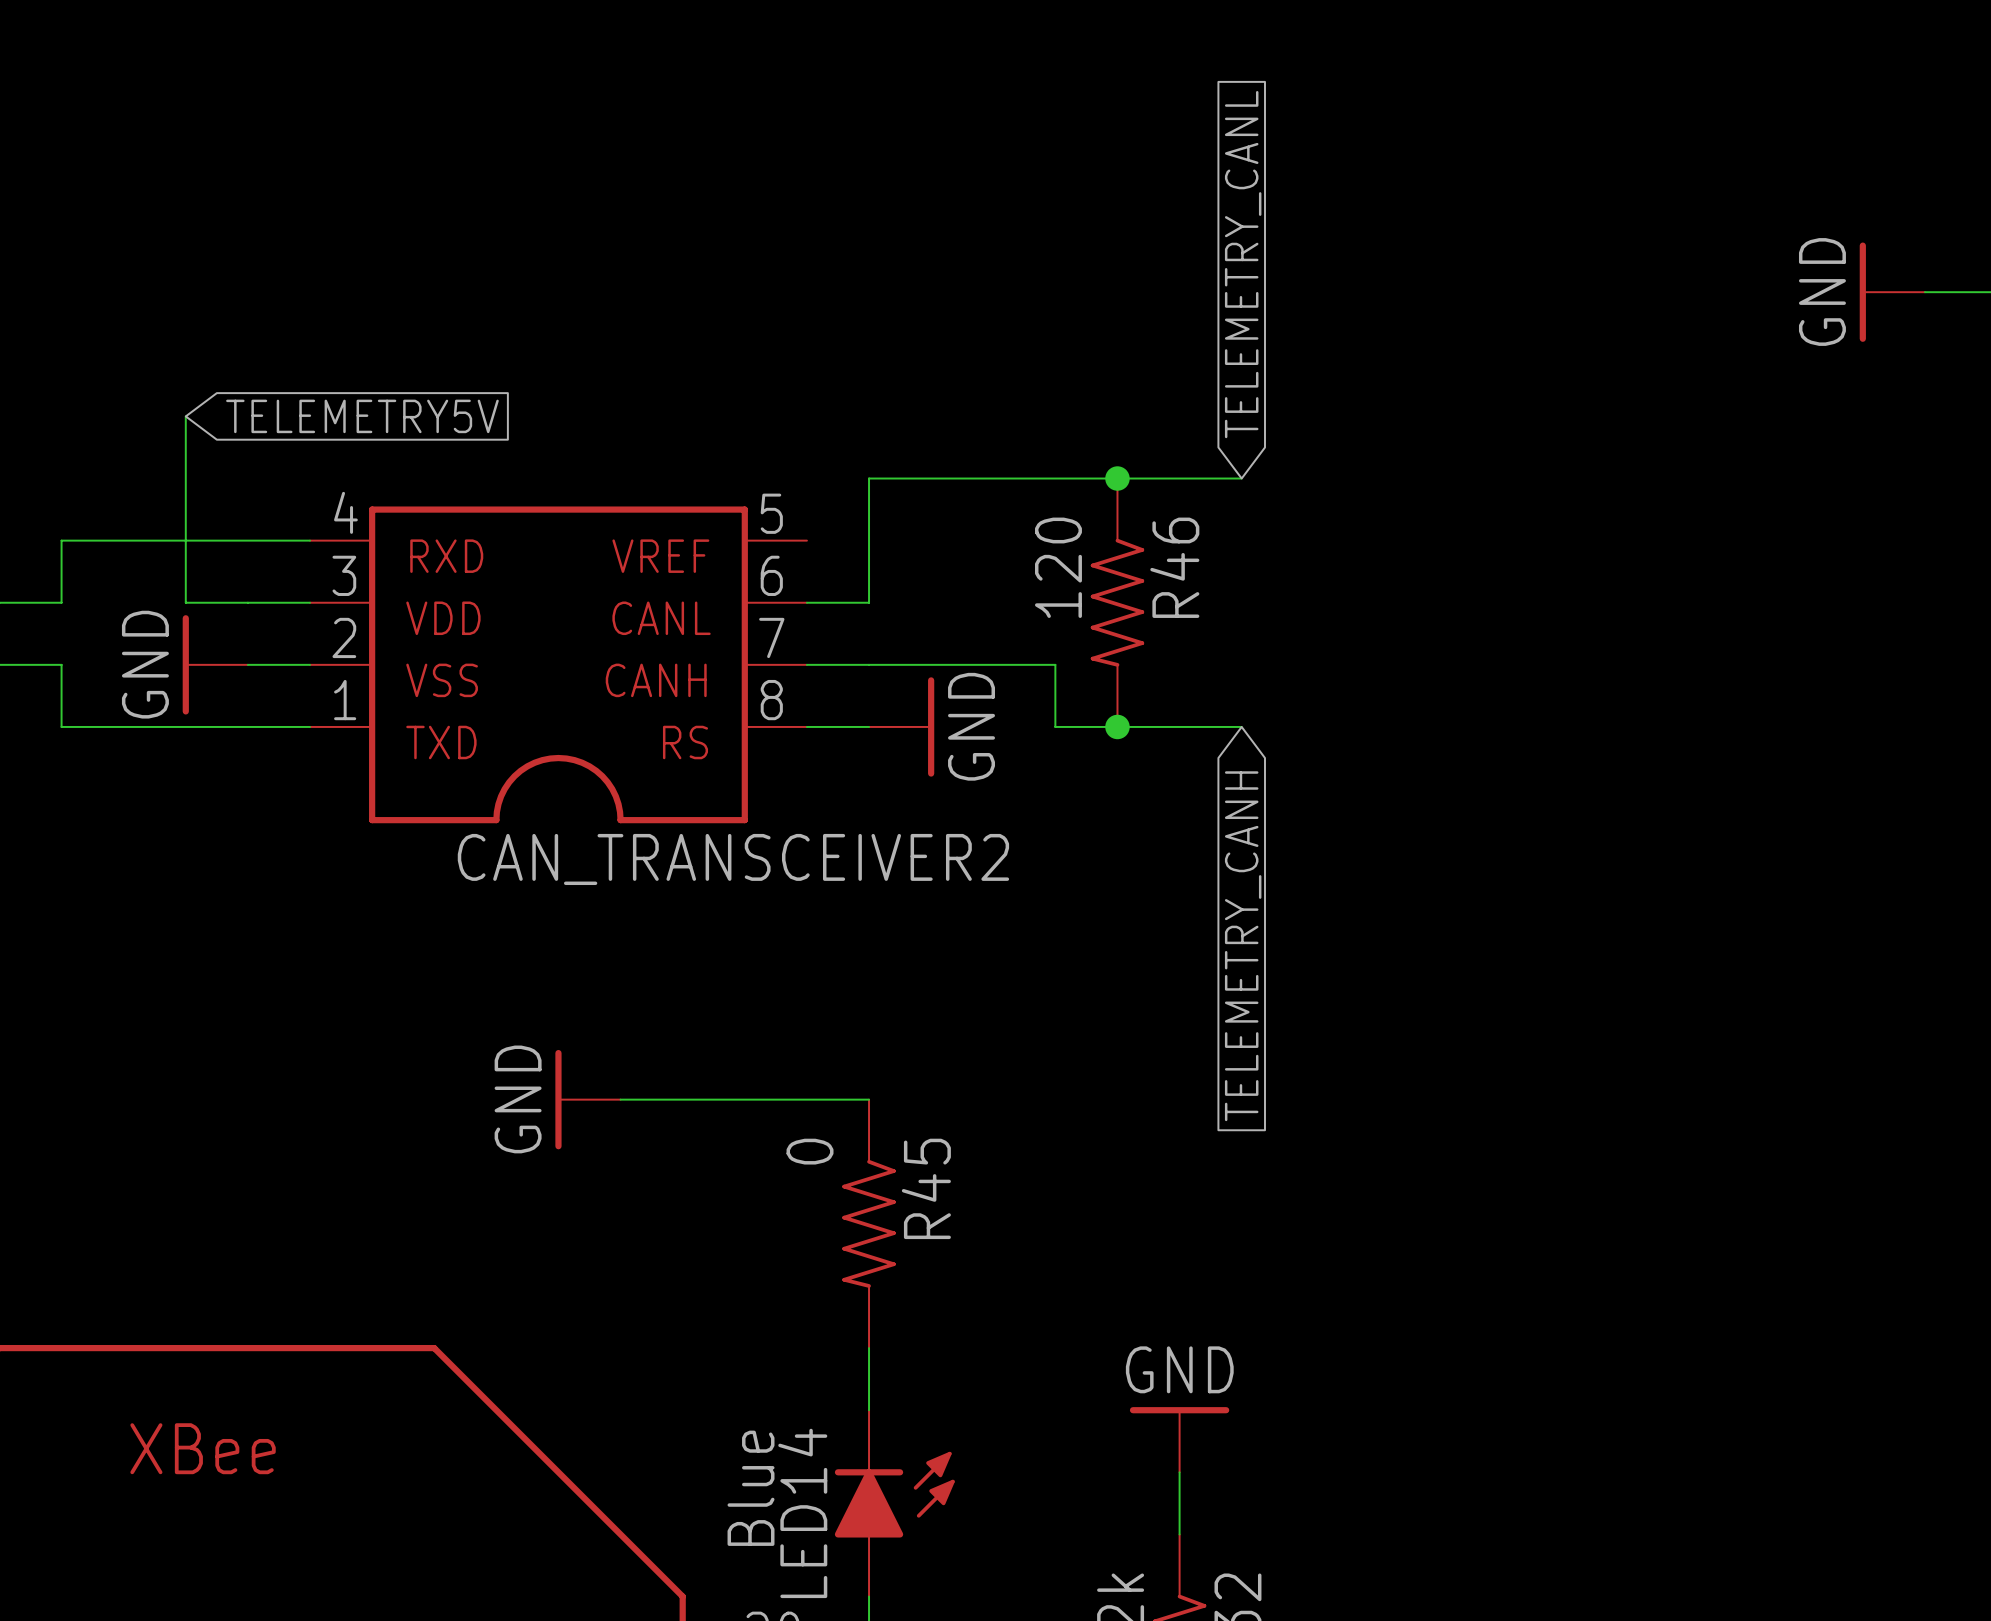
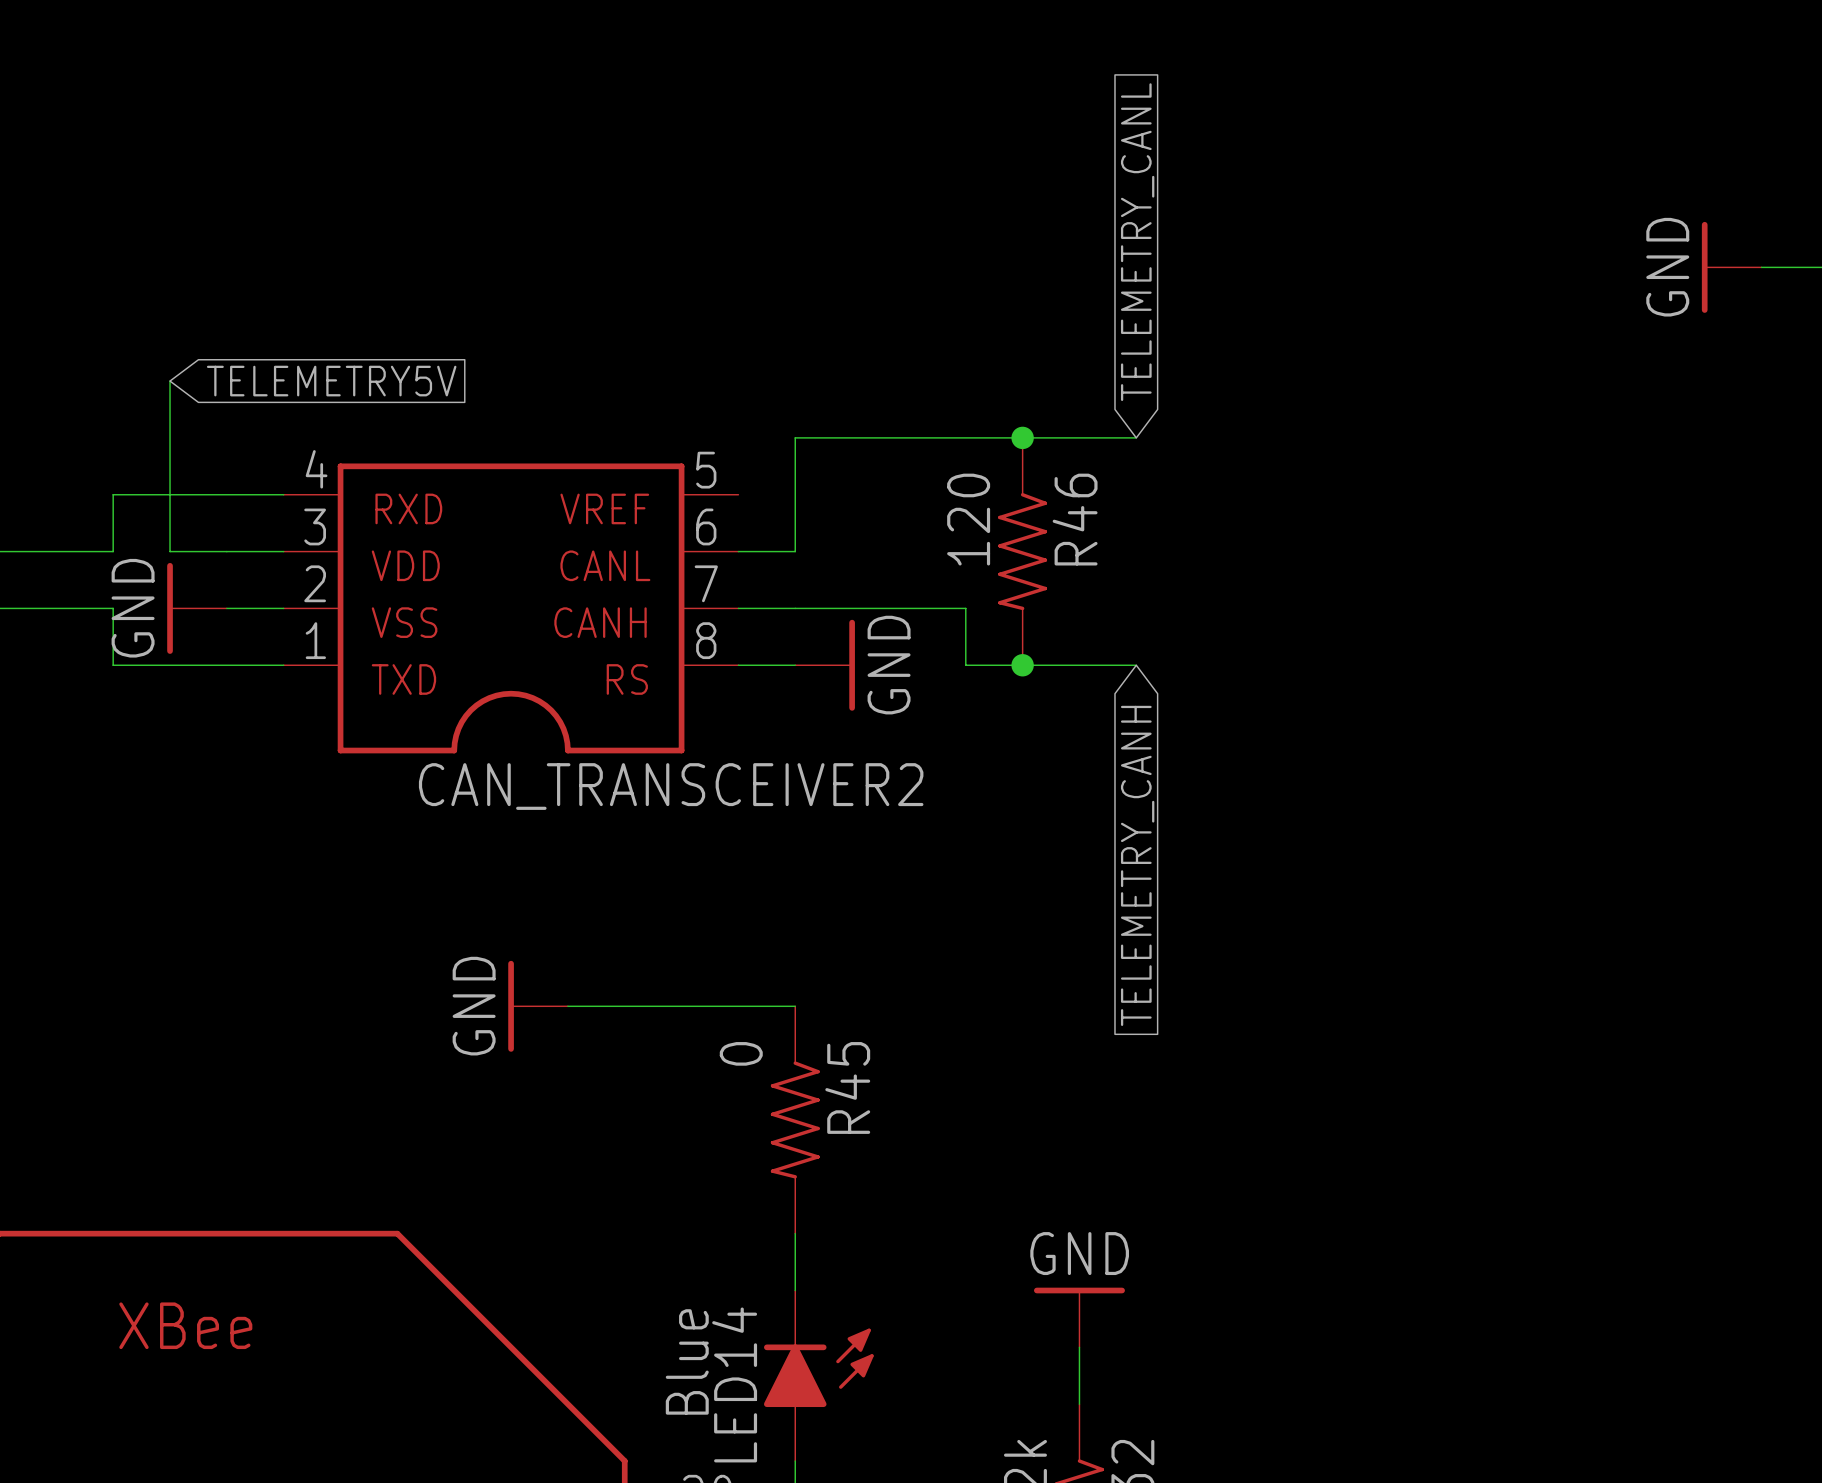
wire: (123, 540) (61, 540) (61, 602) -> (113, 494) (113, 551) (56, 551)
wire: (61, 664) (61, 726) (123, 726) -> (56, 608) (113, 608) (113, 665)

